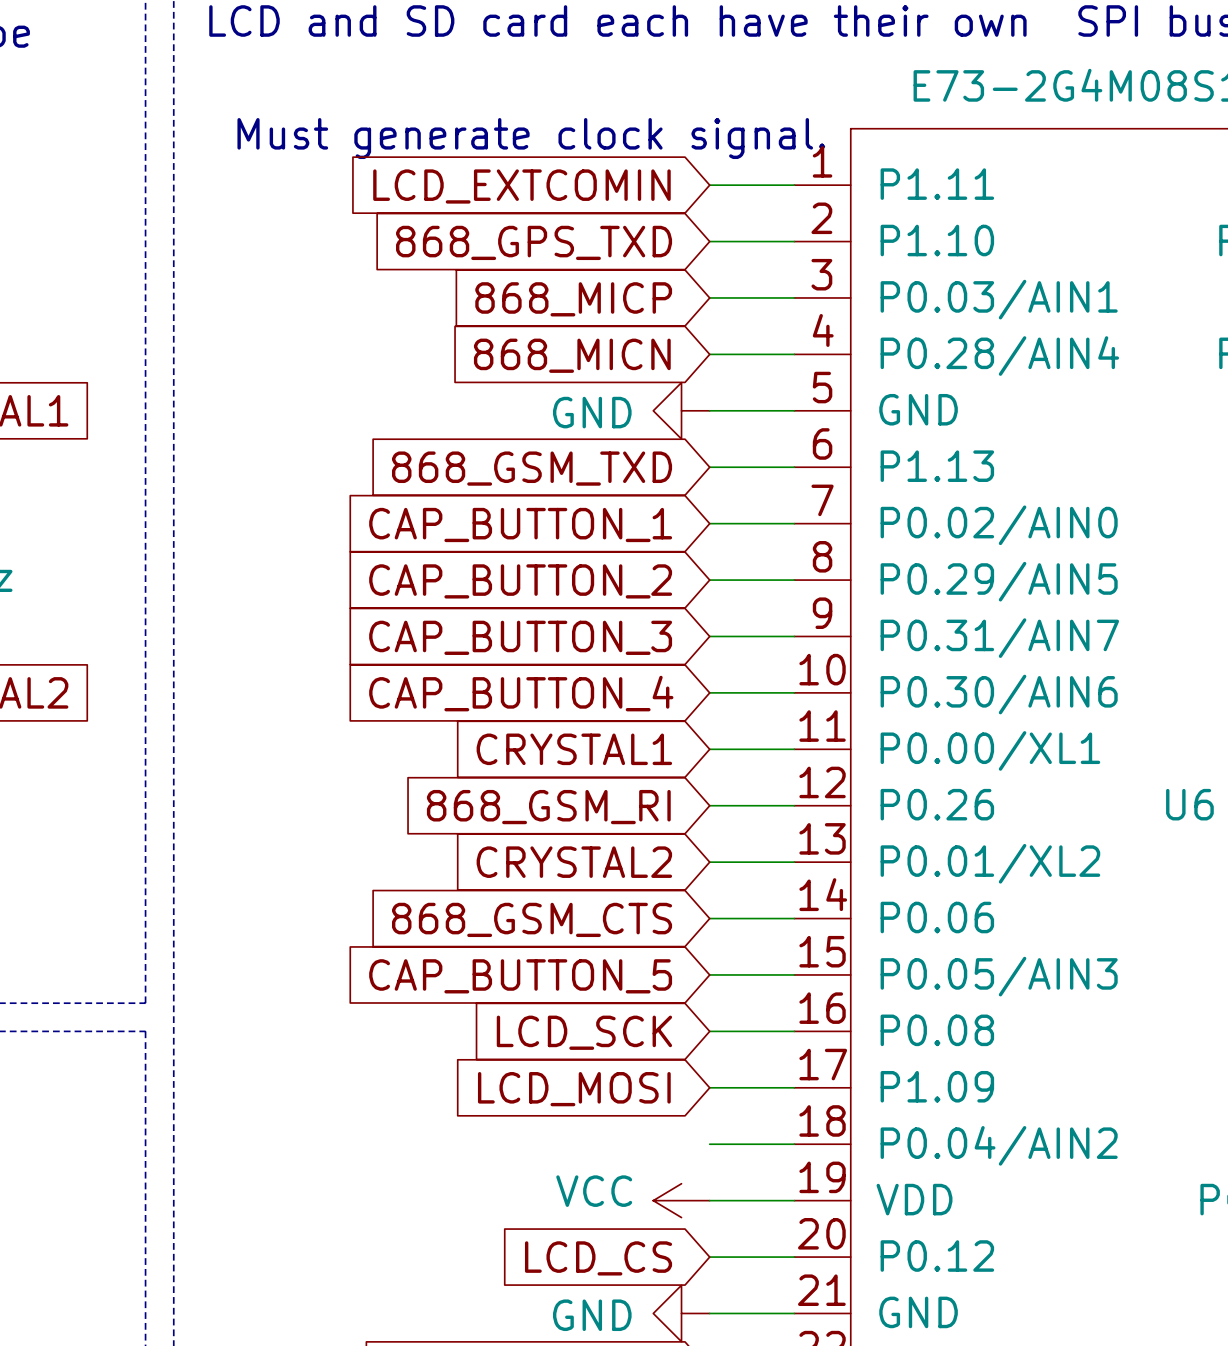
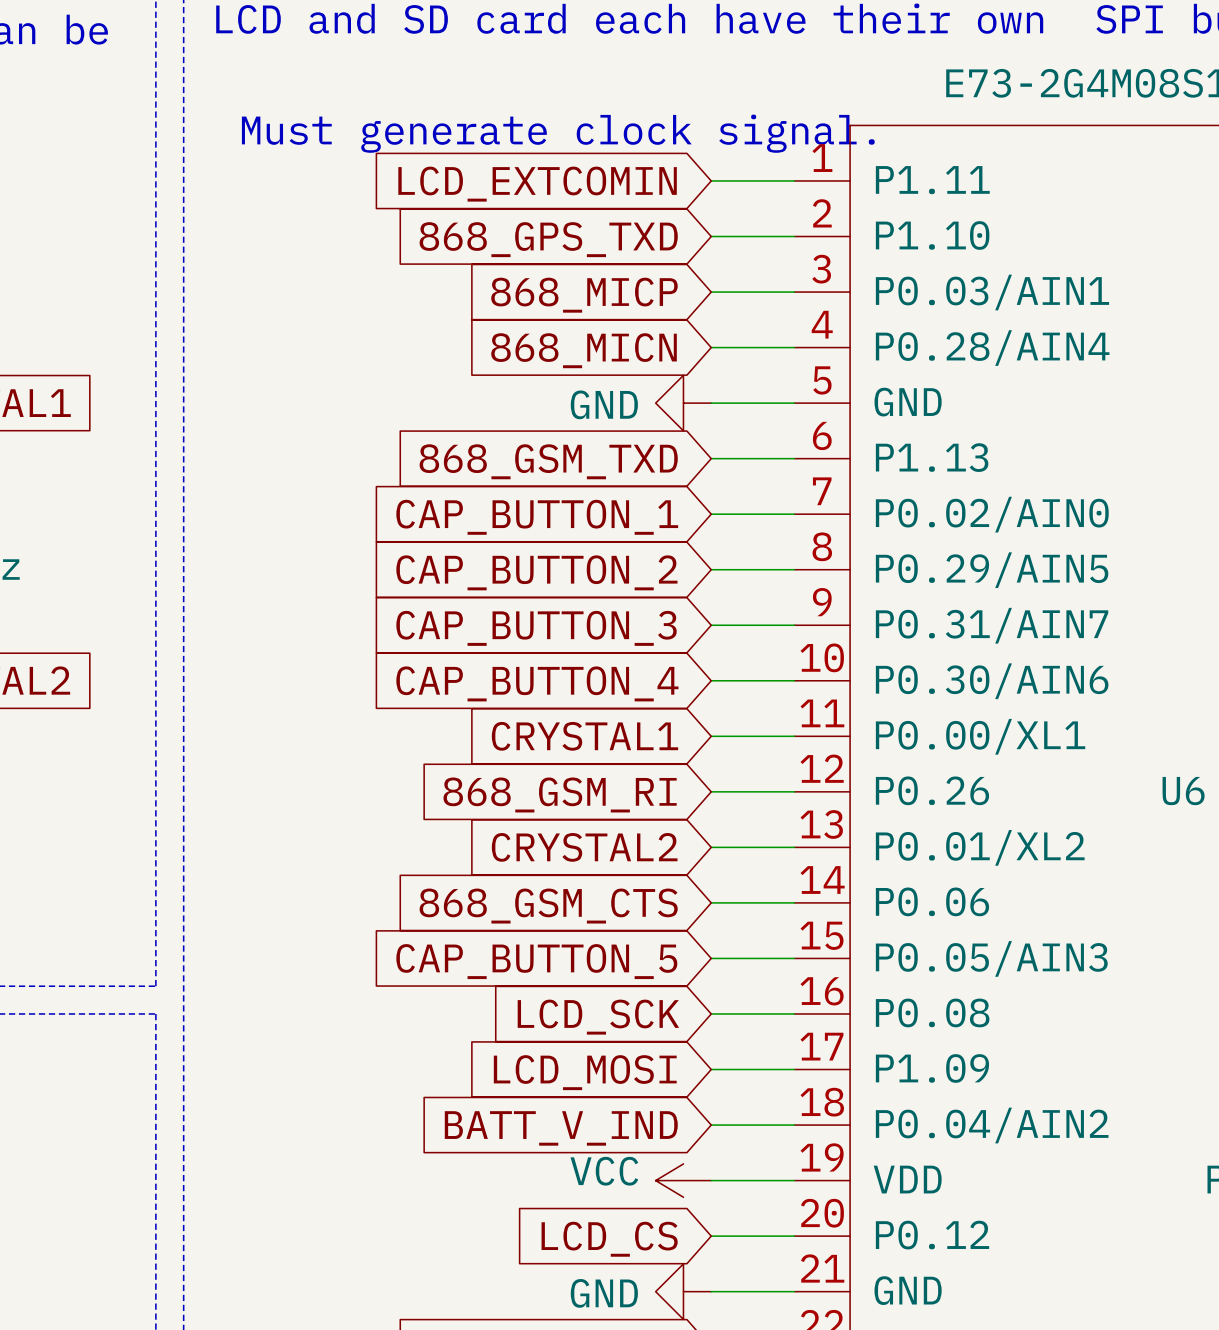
global label: none -> BATT_V_IND (561, 1128)

